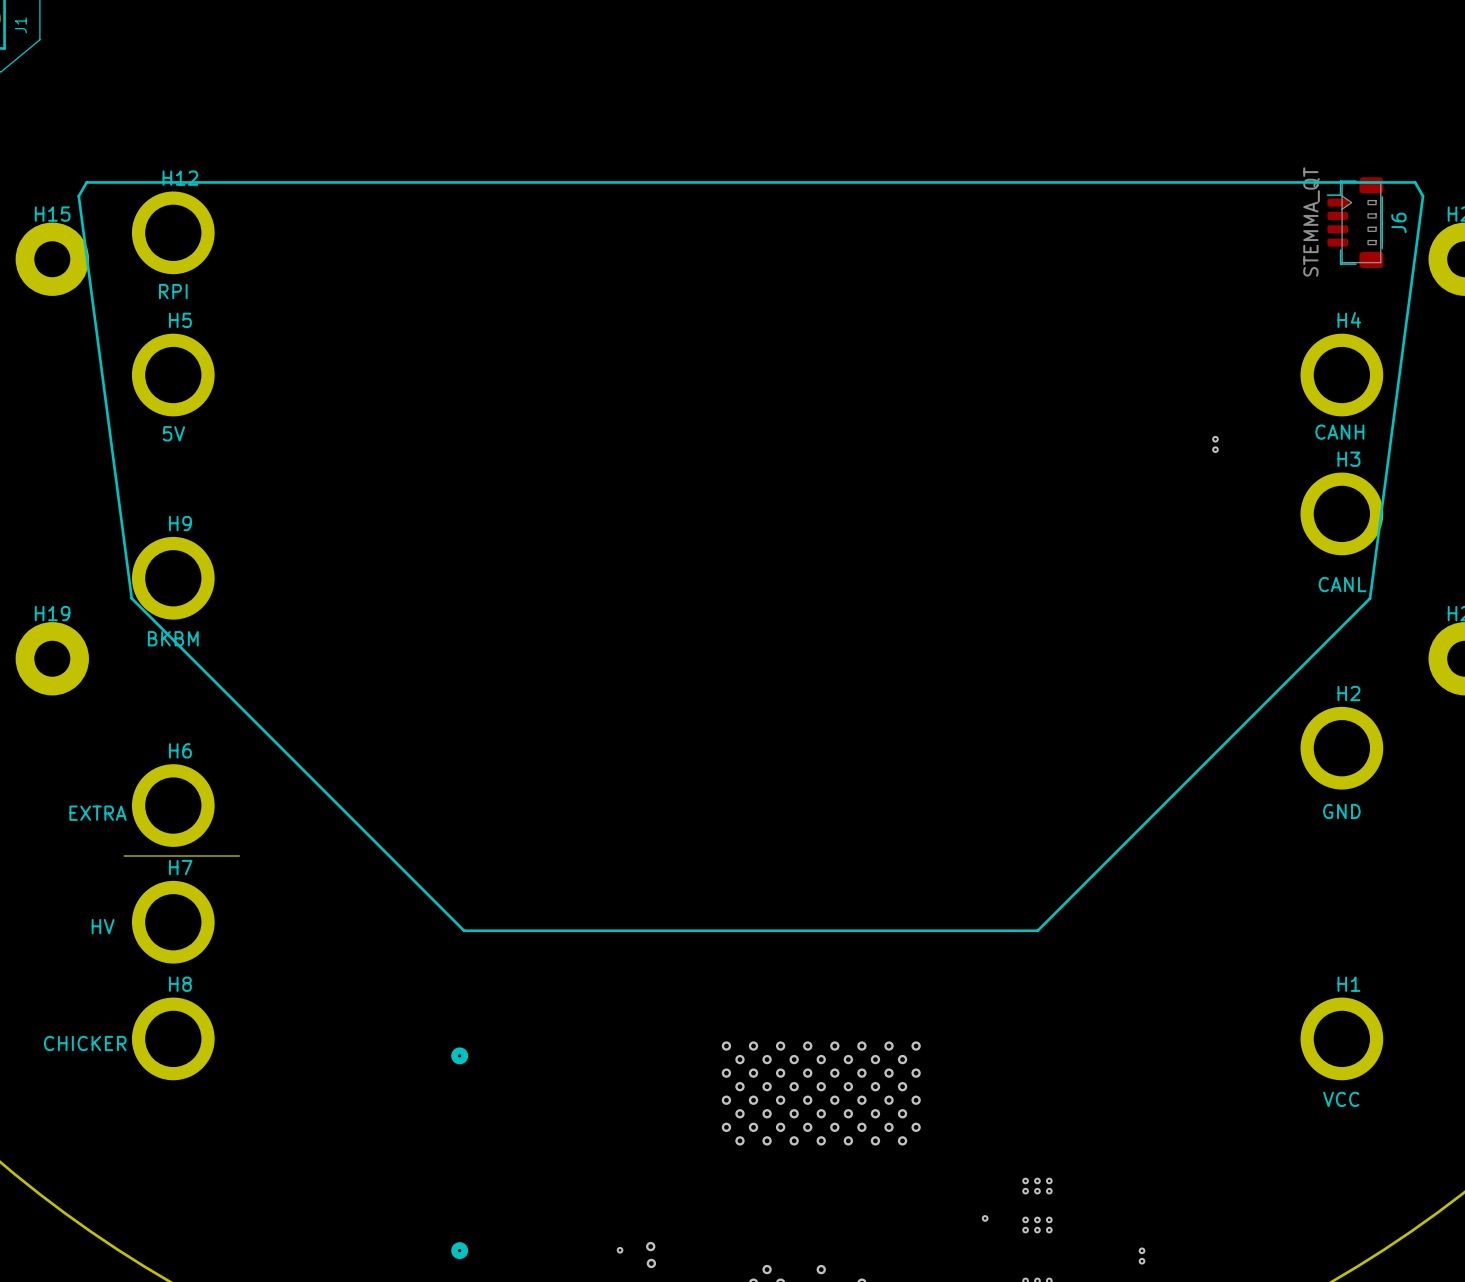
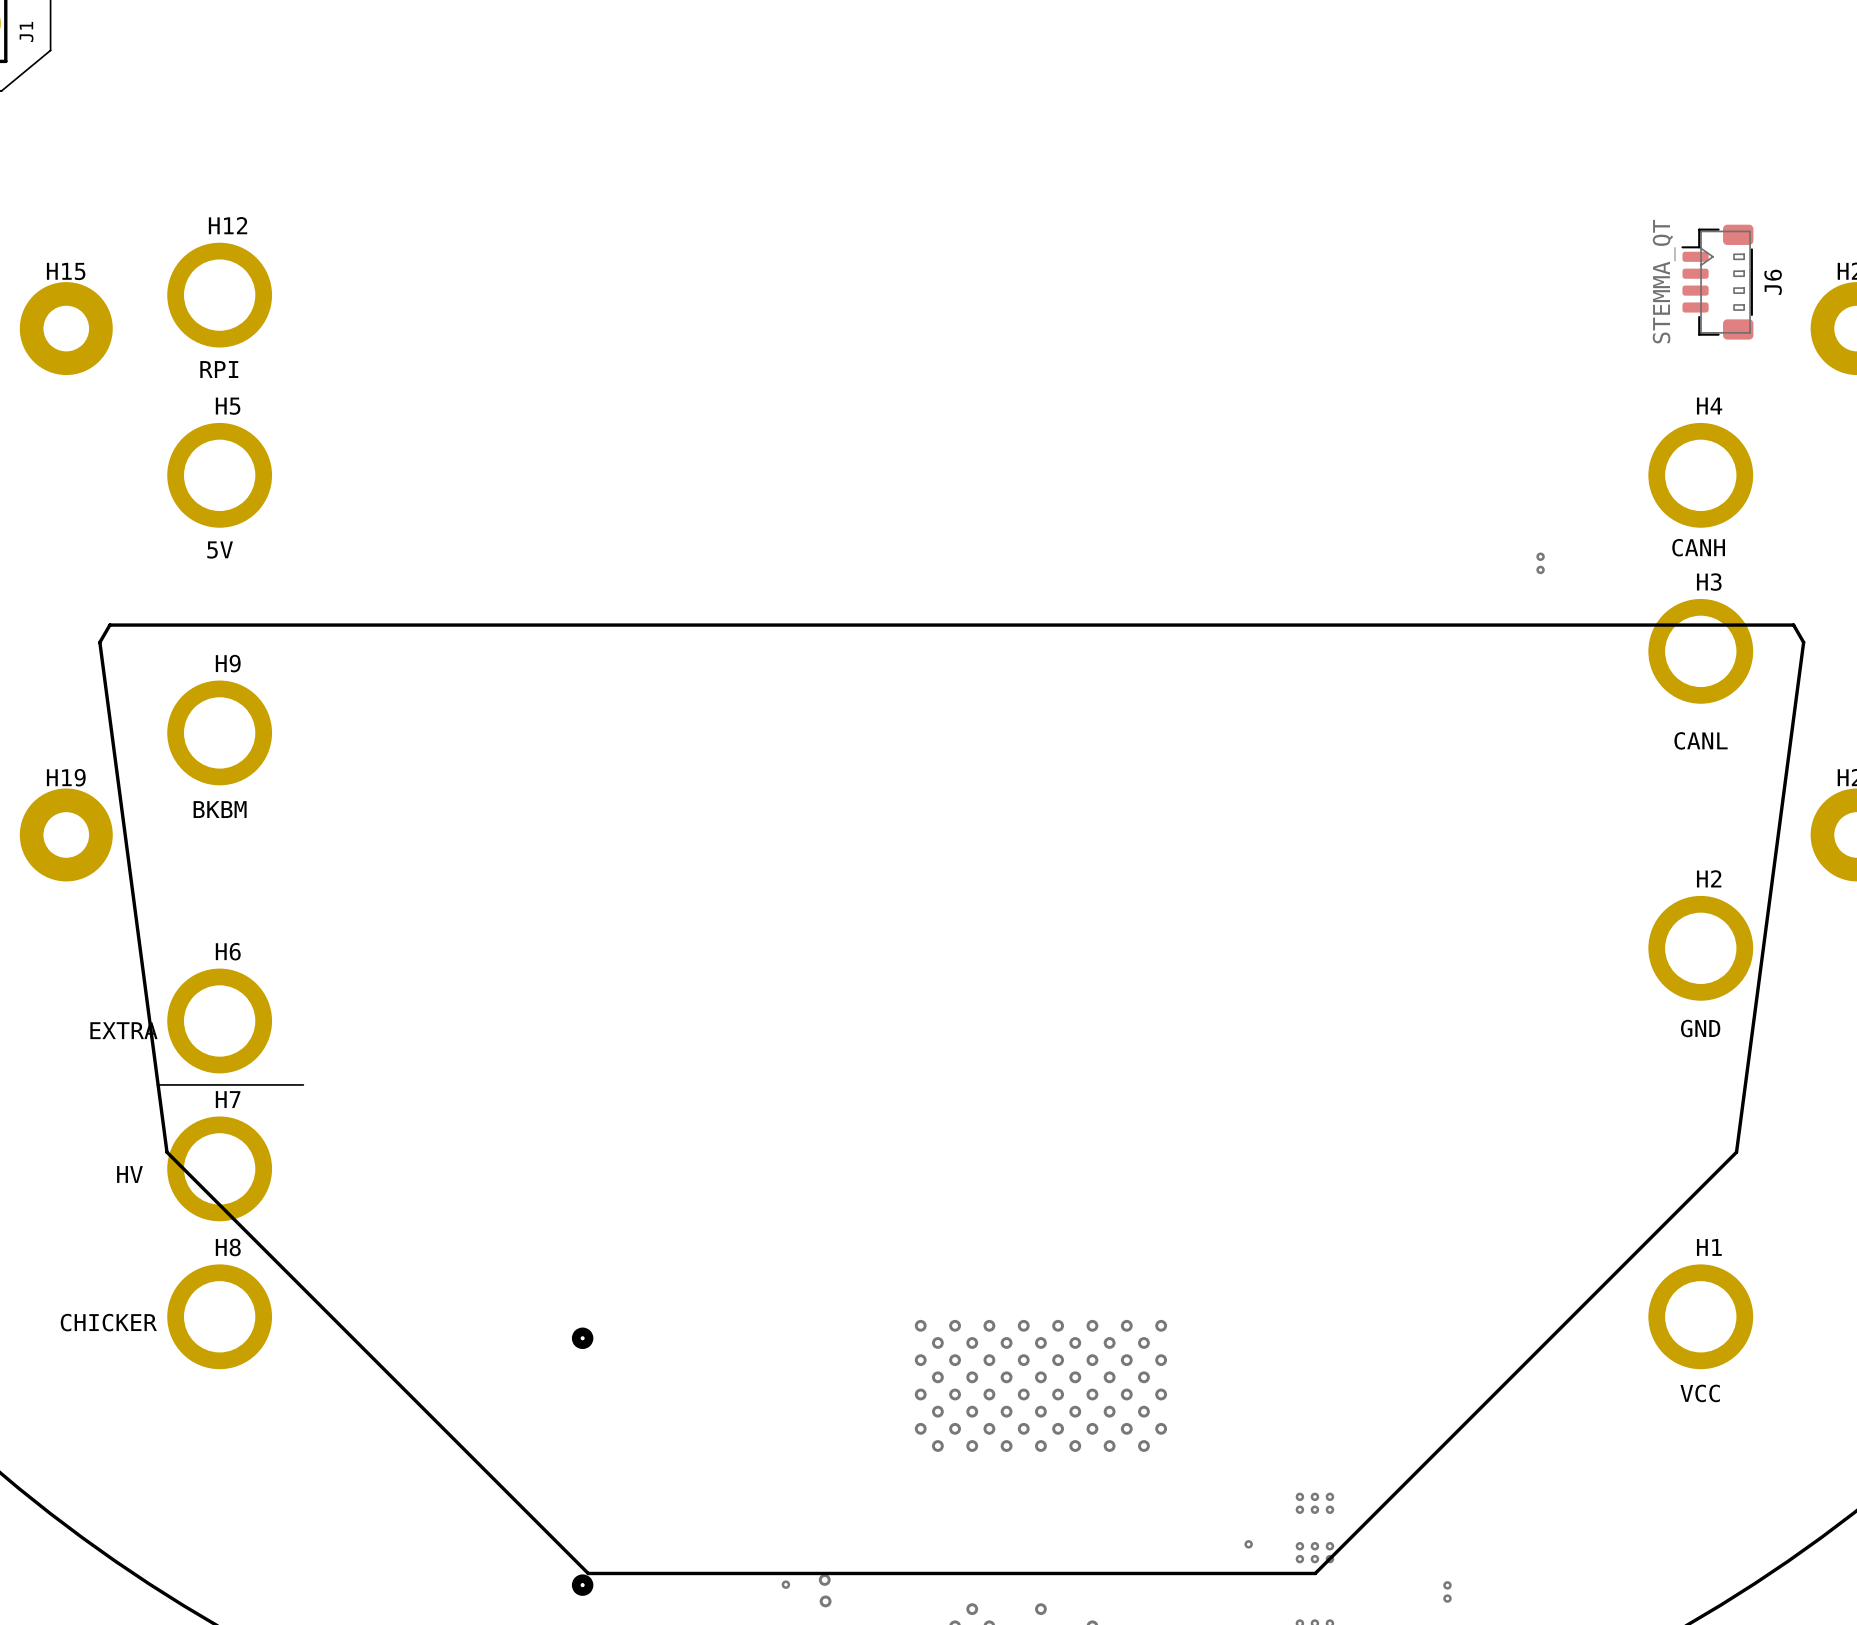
line: (86, 182) (78, 196) (131, 598) (464, 930) (1037, 930) (1370, 598) (1423, 196) (1415, 182) (86, 182) -> (109, 625) (99, 642) (166, 1152) (588, 1573) (1315, 1573) (1736, 1152) (1803, 642) (1793, 625) (109, 625)

